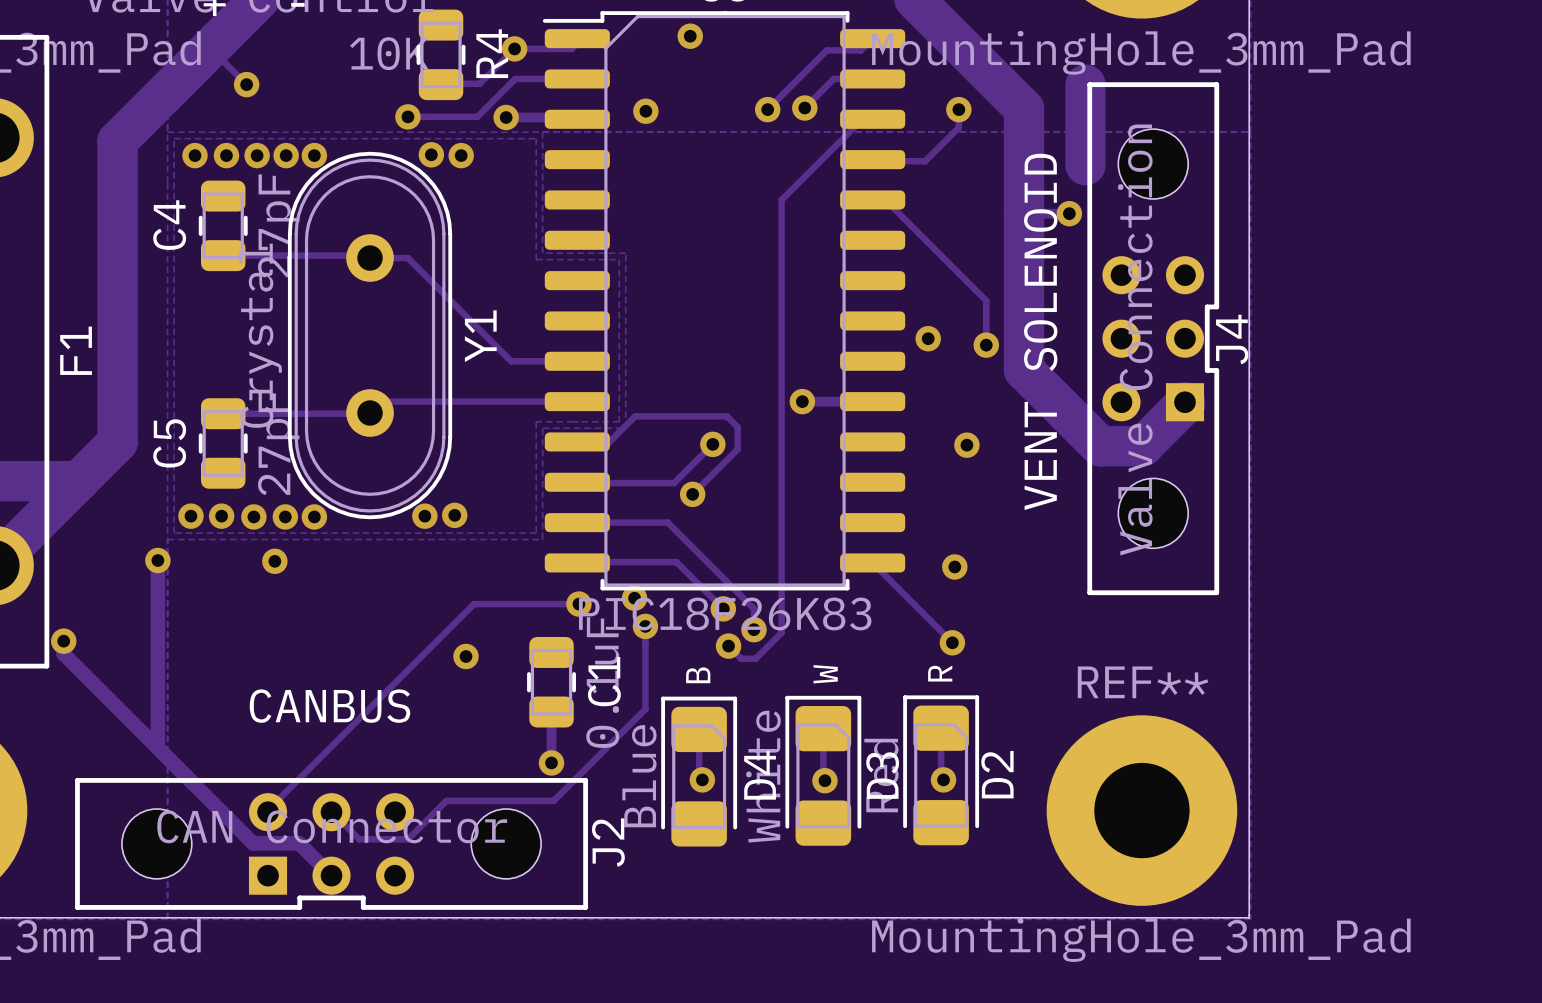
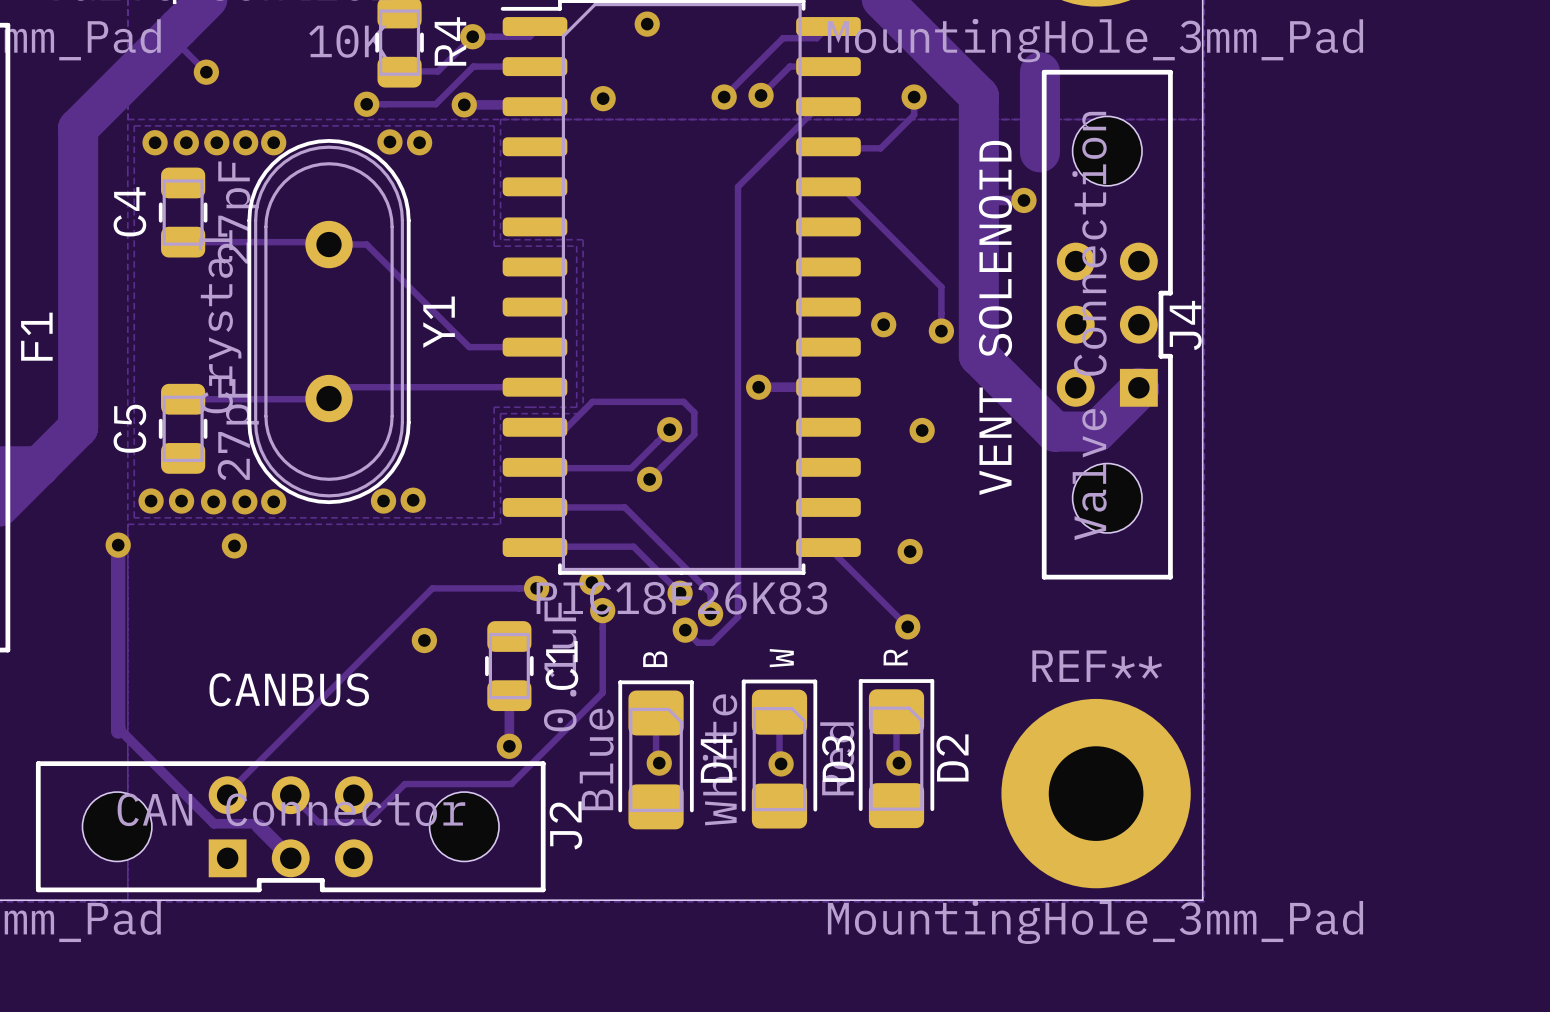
track: (63, 641) (63, 653) (253, 843) (299, 843) -> (118, 728) (213, 823) (256, 823) (258, 826)
via: (63, 641) -> none

